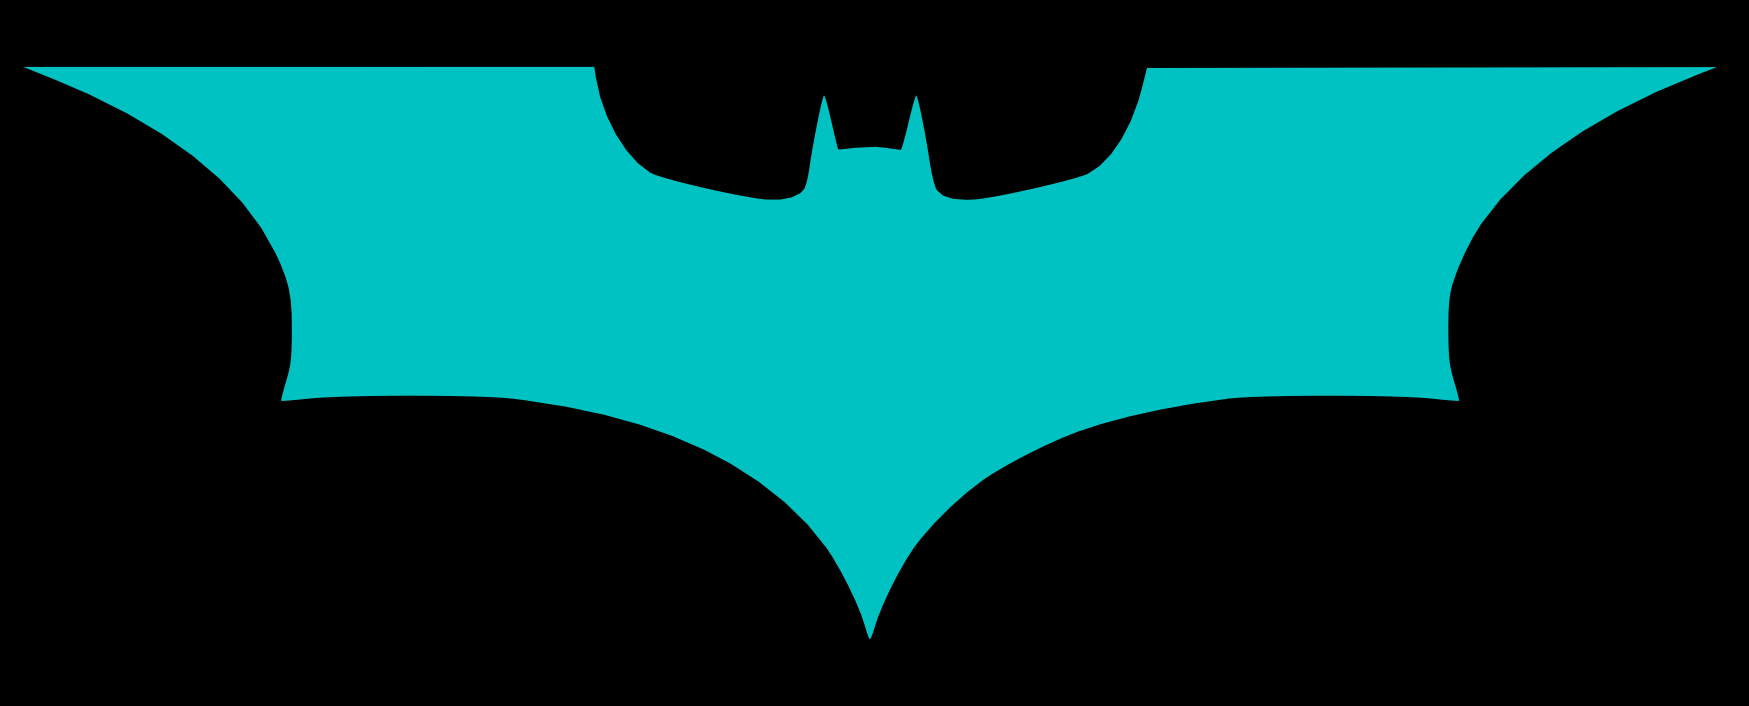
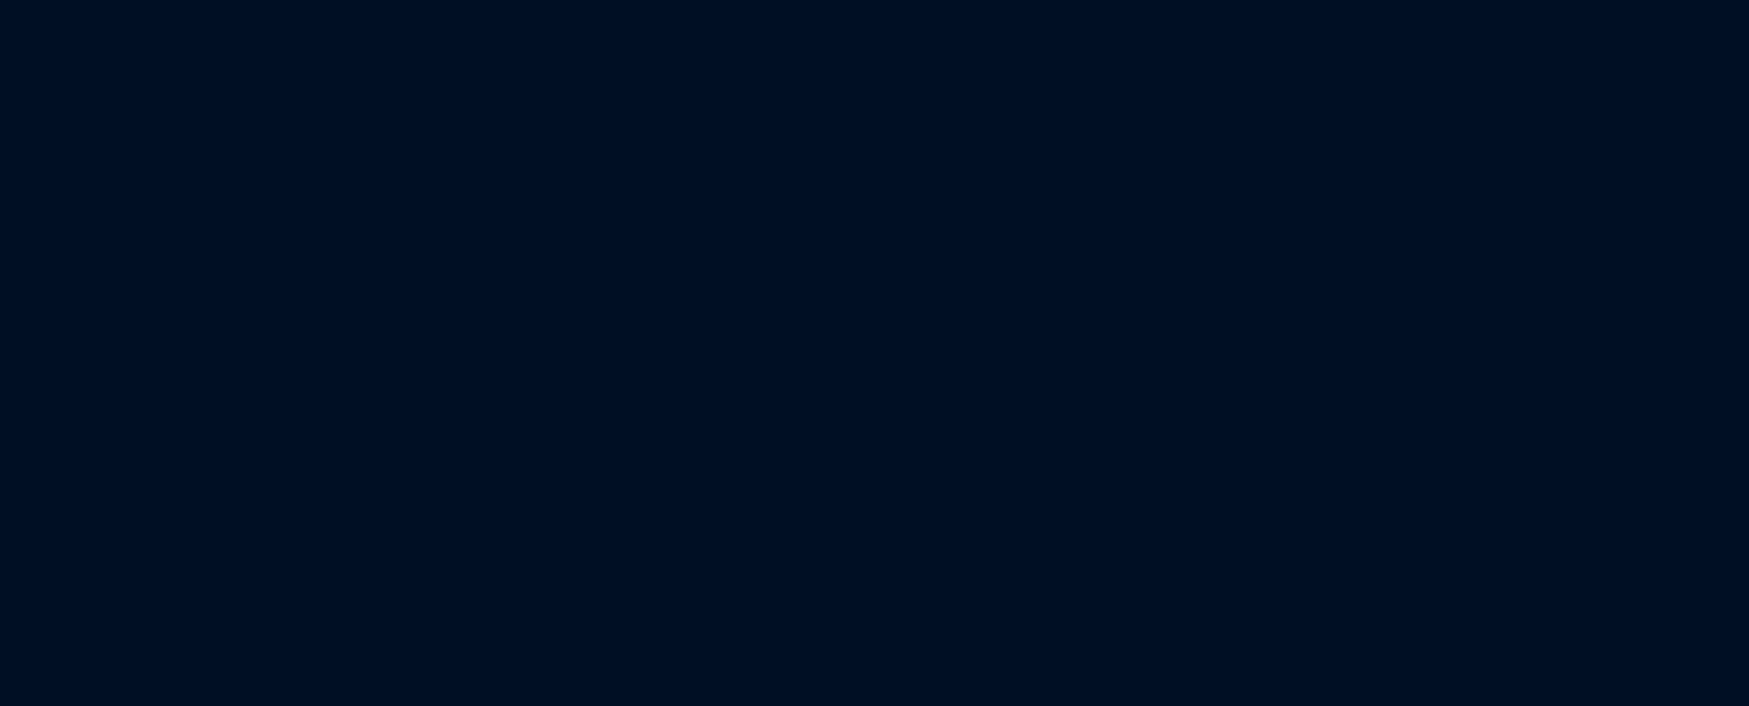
part: (870, 353) -> none

